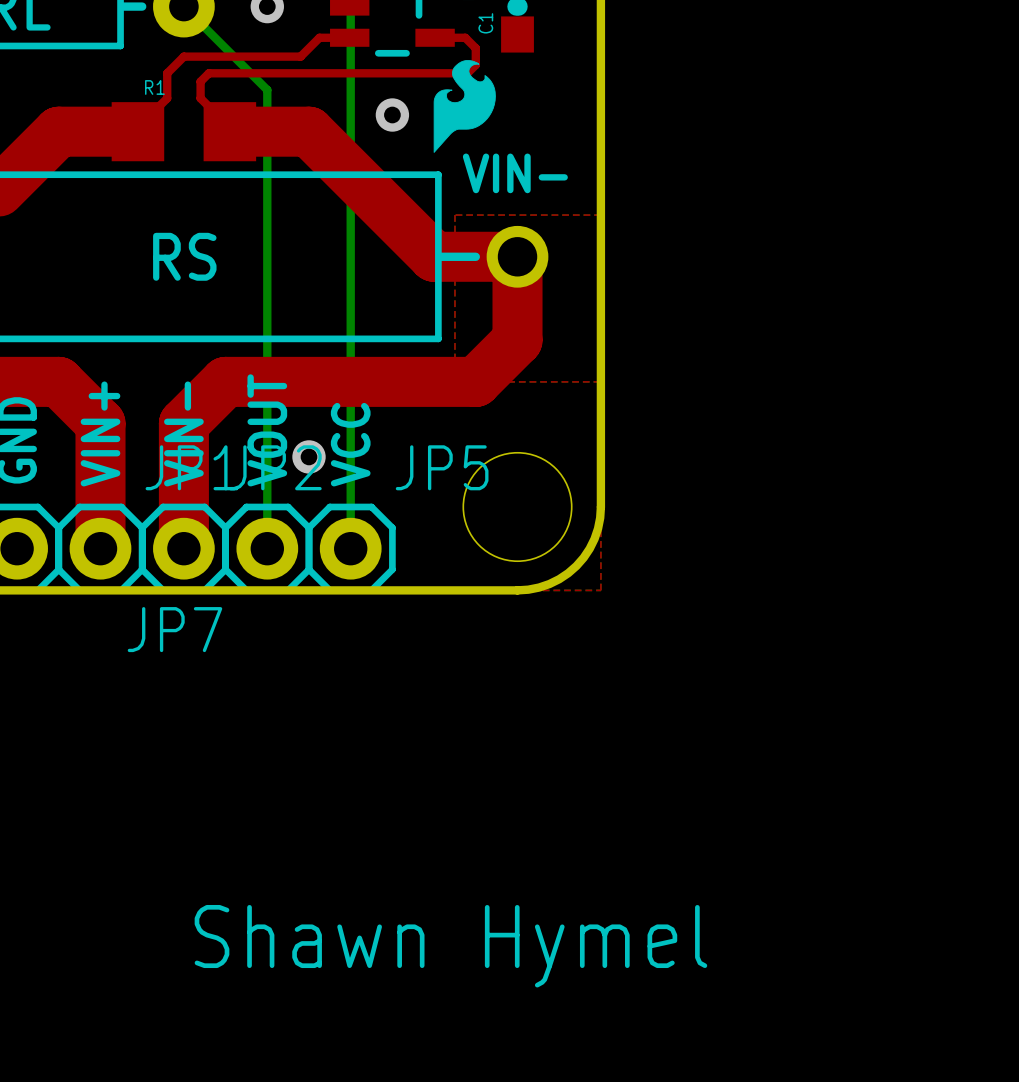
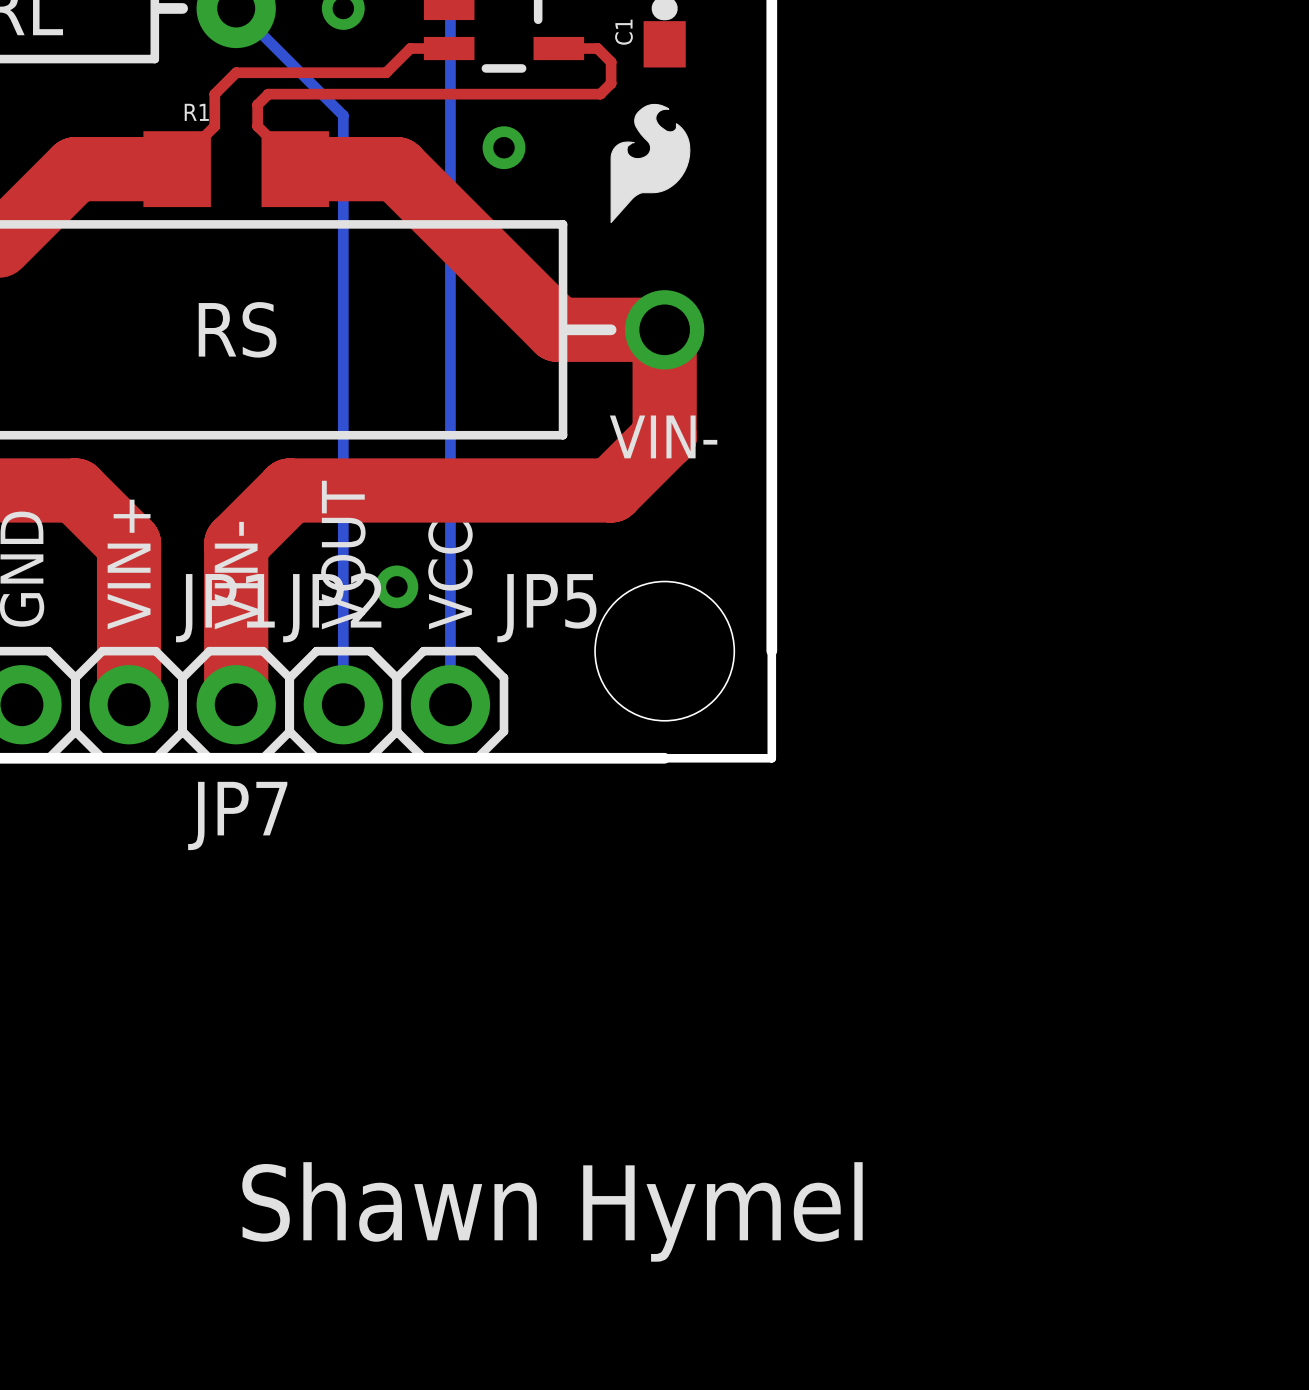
drawing position: (464, 106) -> (650, 163)
text position: VIN- (515, 173) -> VIN- (663, 436)
top zone outline: (600, 215) (454, 215) (454, 381) (600, 381) -> none
board edge: (600, 506) (594, 538) (576, 565) (549, 584) (517, 590) -> (771, 651) (771, 758) (664, 758)

